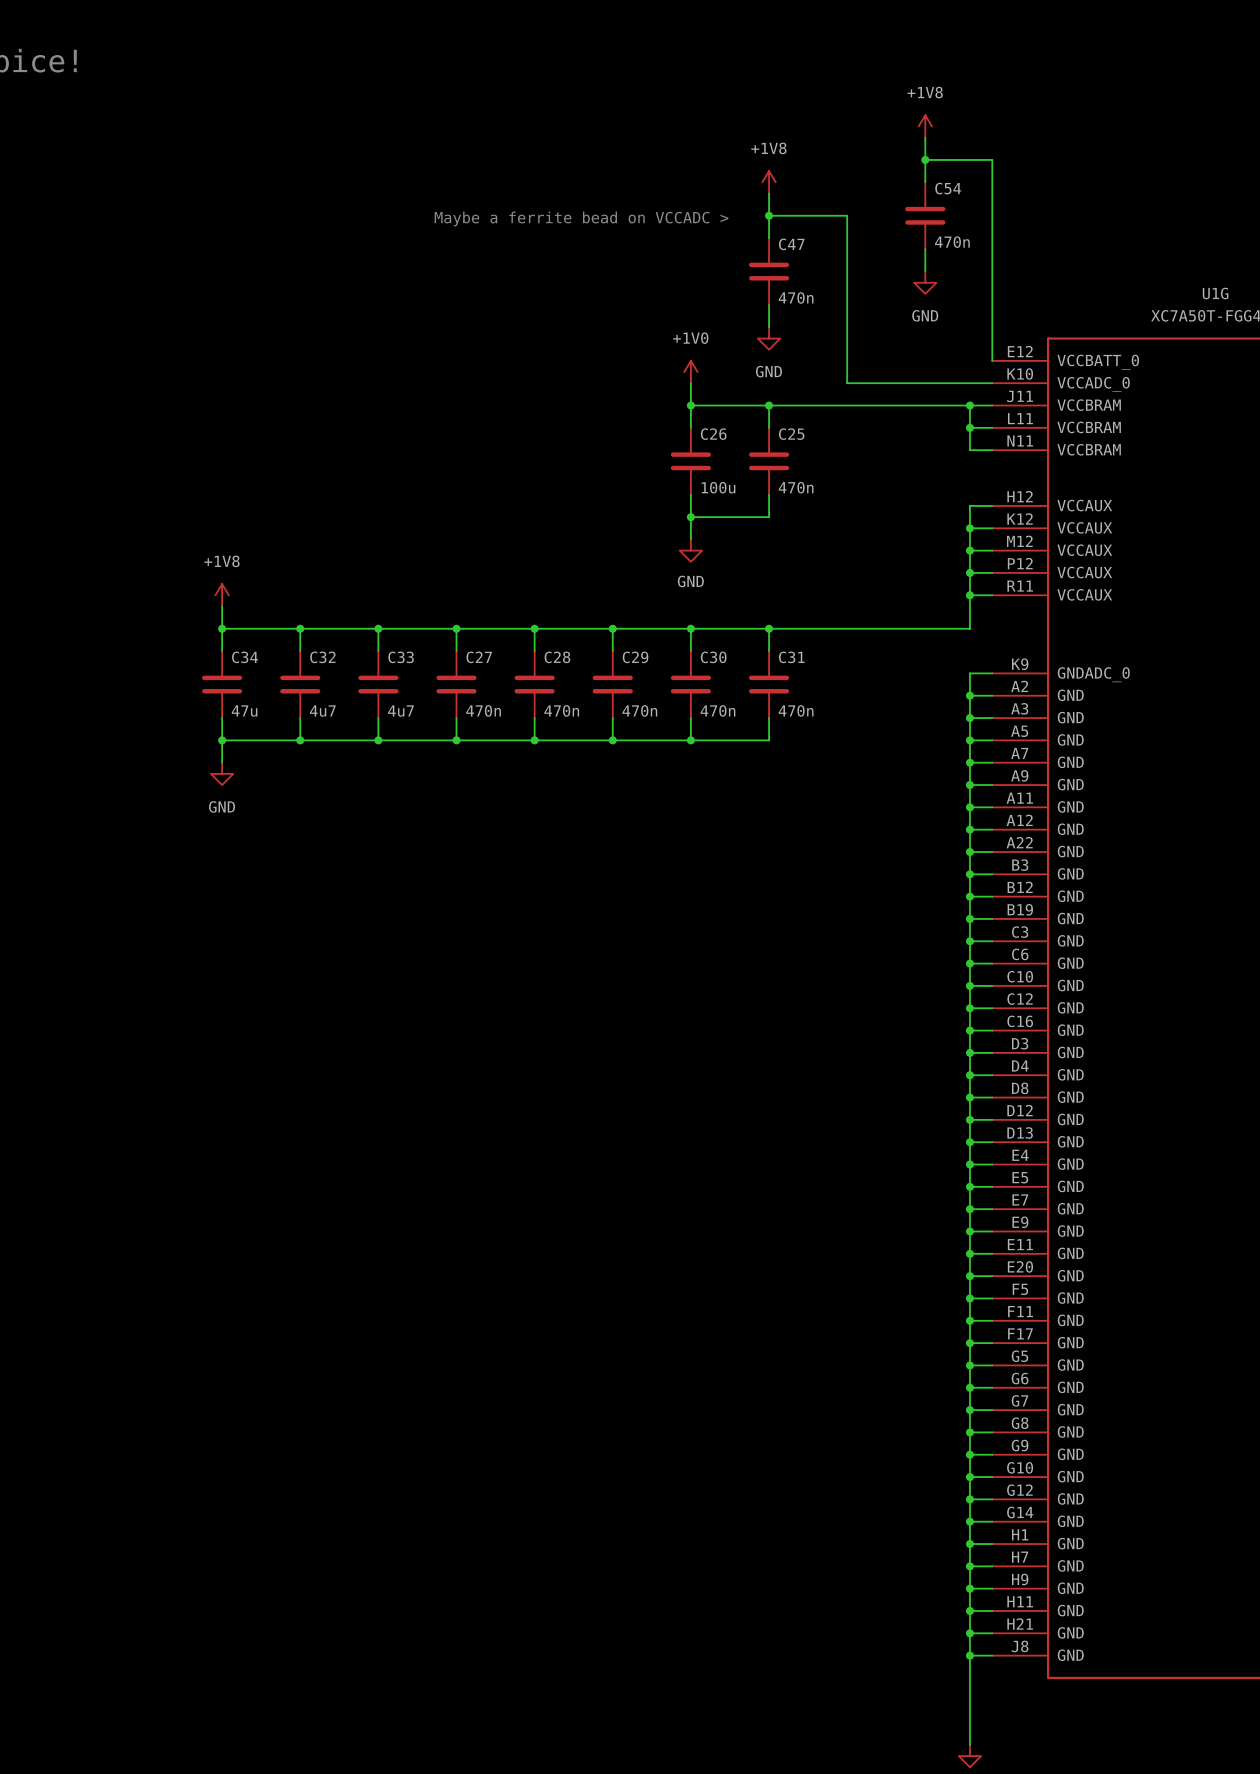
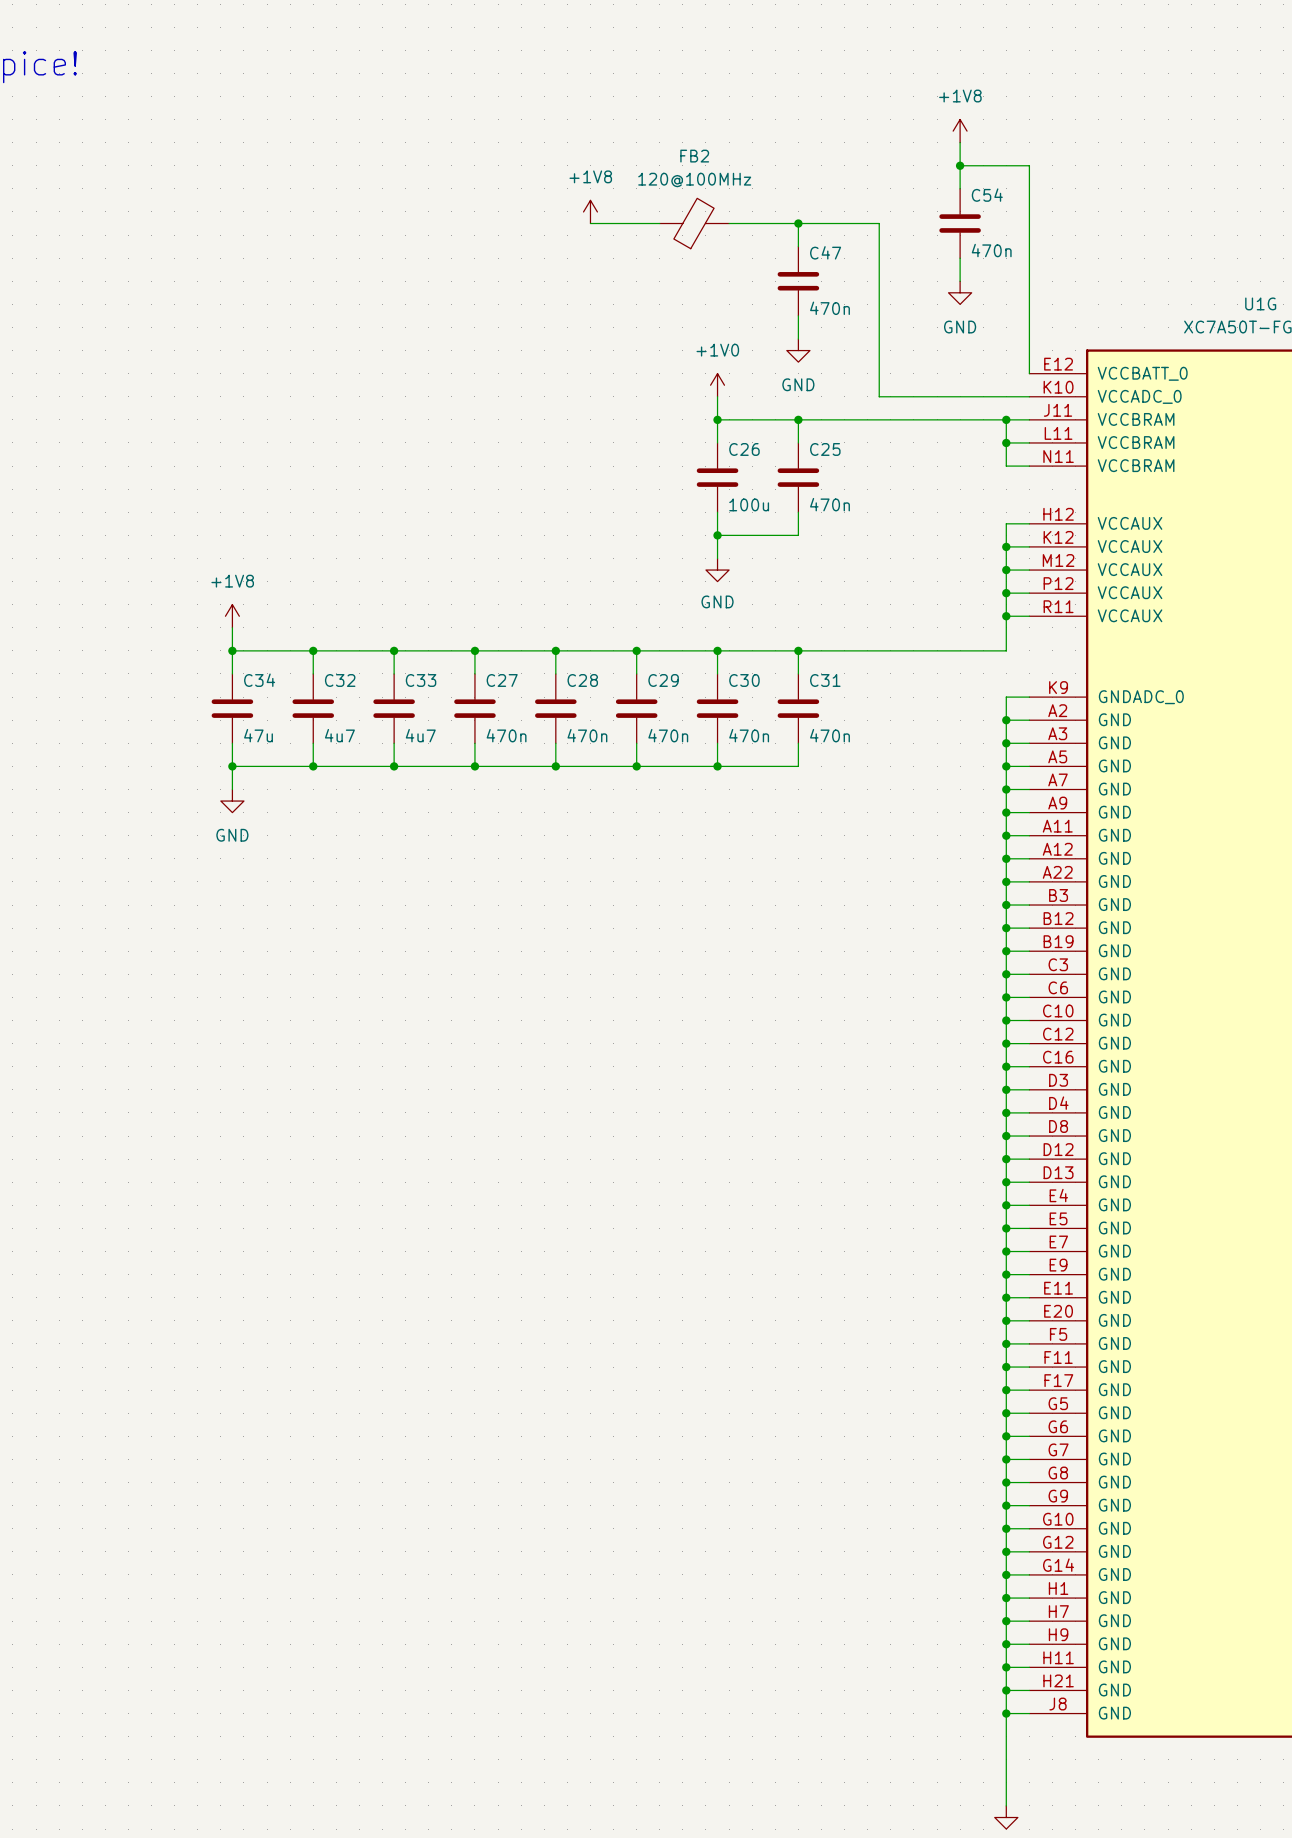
power symbol position: +1V8 (769, 182) -> +1V8 (590, 211)
wire: (769, 193) (769, 215) -> (729, 223) (798, 223)
wire: none -> (590, 223) (659, 223)
FB2: none -> 120@100MHz (694, 223)
text: Maybe a ferrite bead on VCCADC > (581, 218) -> none

